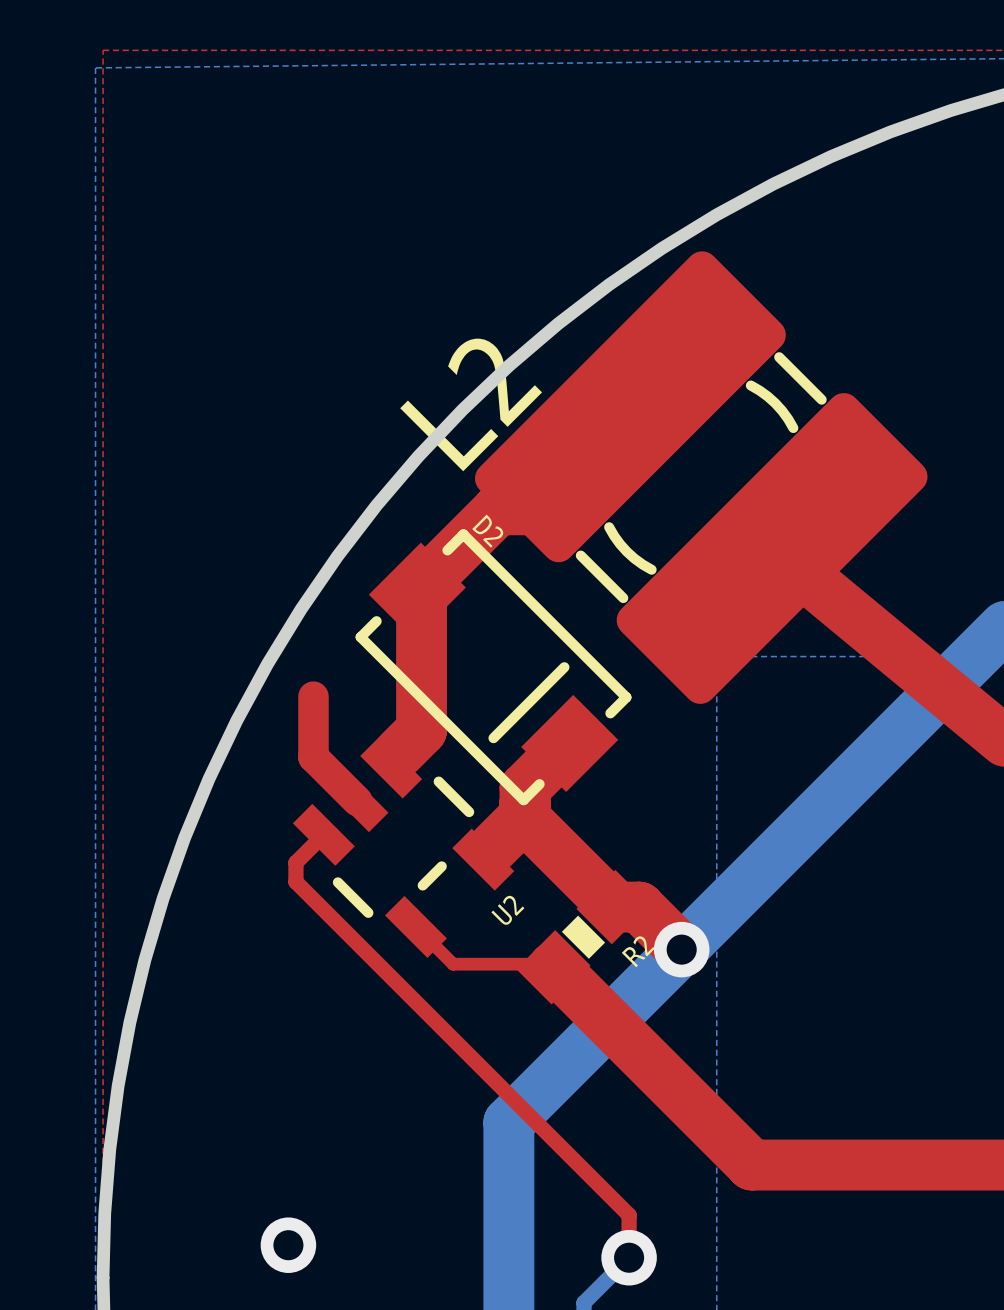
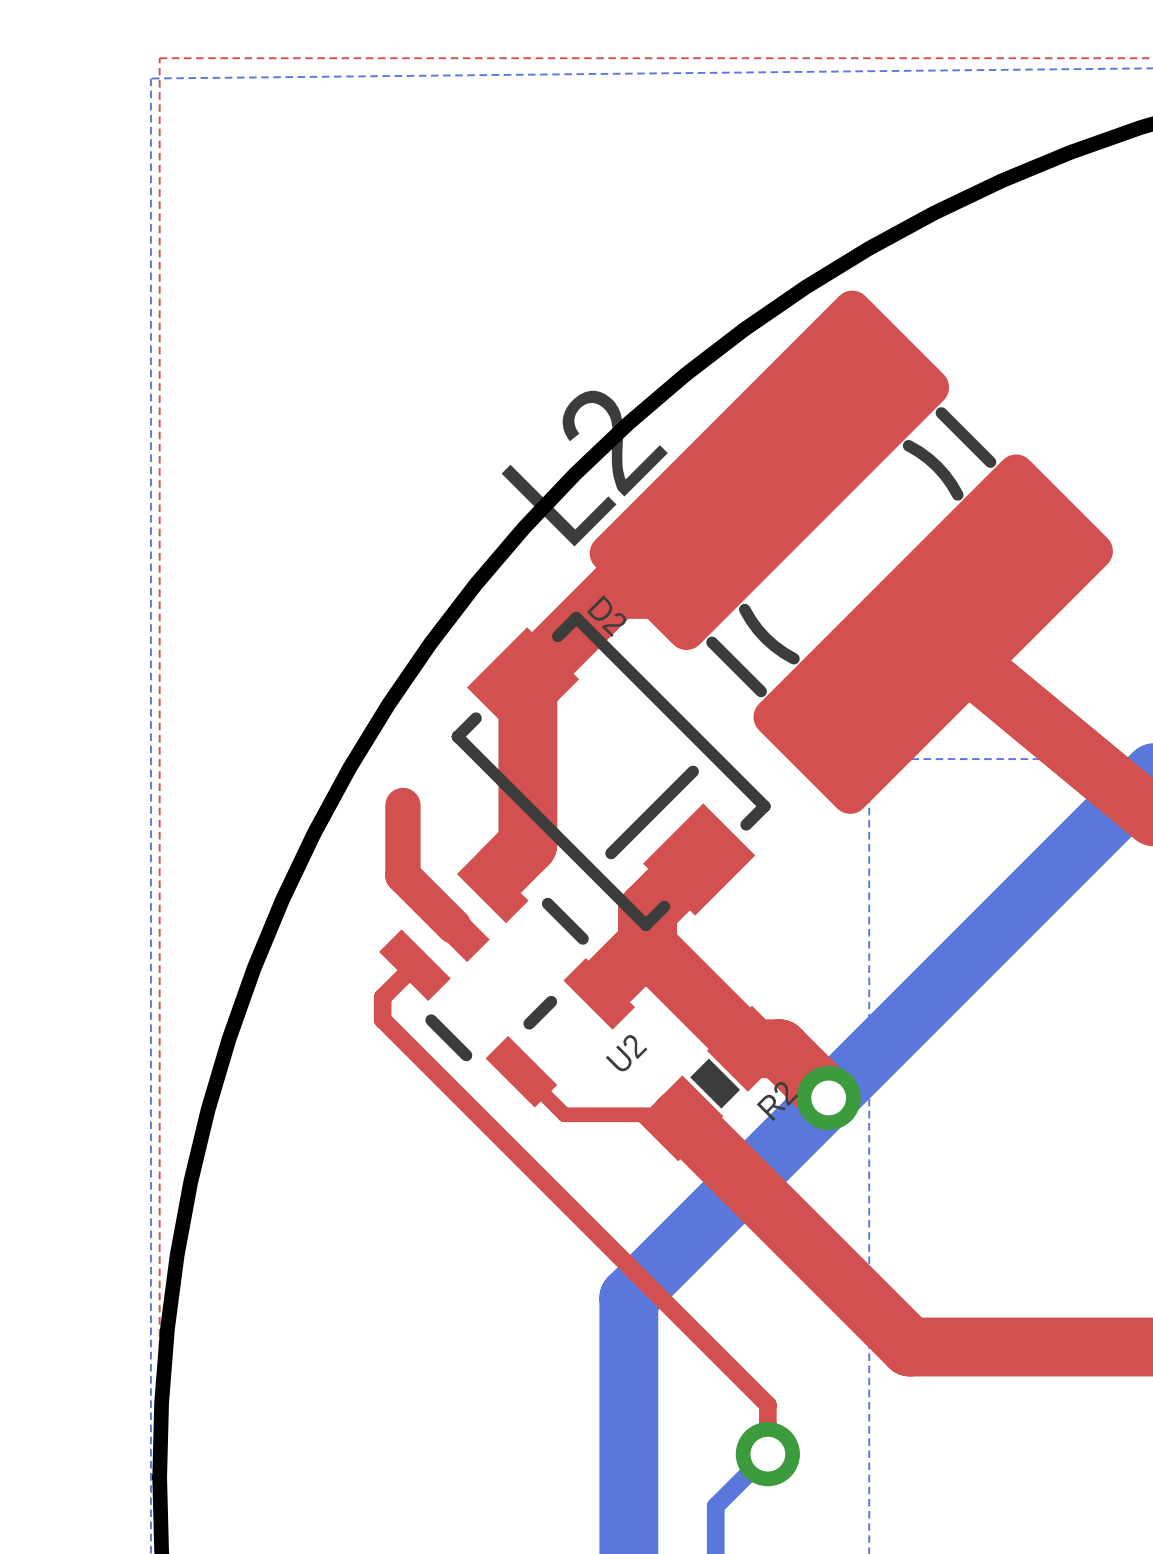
via: (288, 1245) -> none

